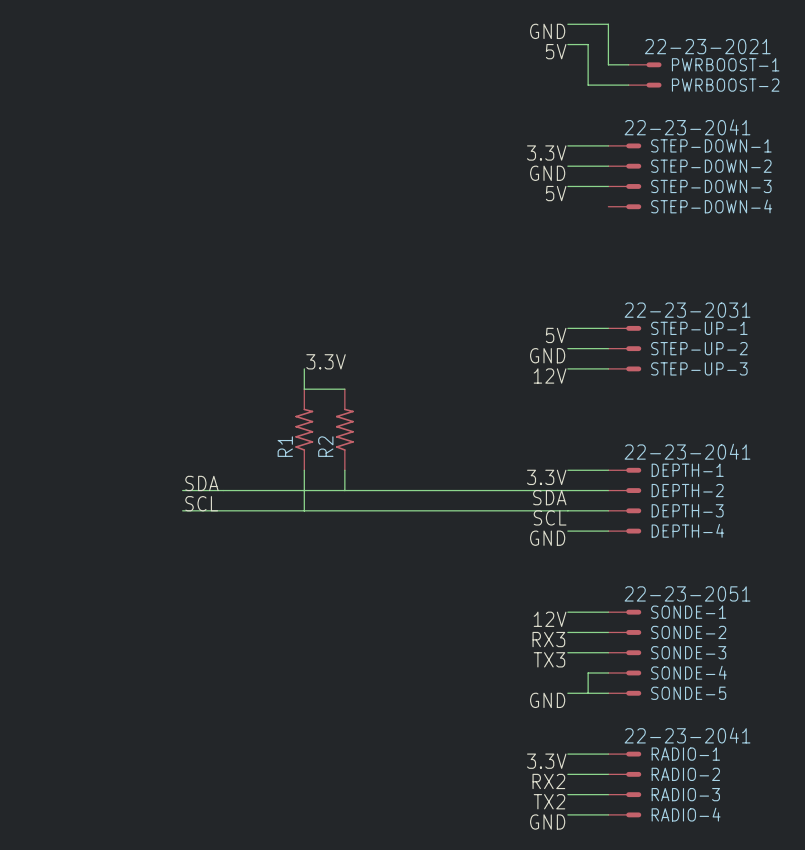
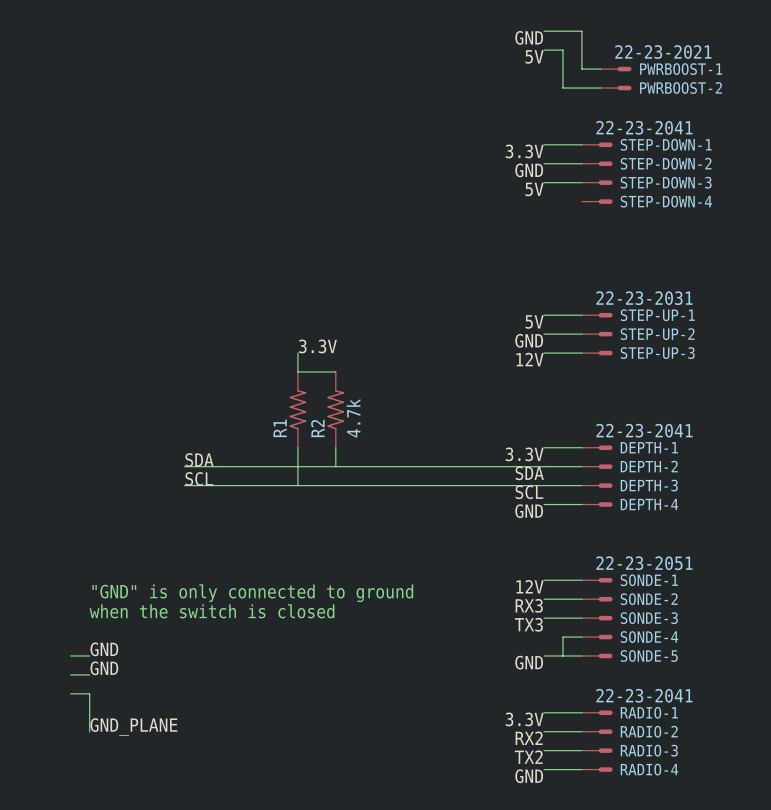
R2 value: none -> 4.7k (353, 418)
text: none -> "GND" is only connected to ground (252, 593)
text: none -> when the switch is closed (212, 611)
label: none -> GND (104, 649)
wire: none -> (70, 655) (89, 655)
label: none -> GND (104, 668)
wire: none -> (70, 674) (89, 674)
wire: none -> (70, 693) (89, 693) (89, 731)
label: none -> GND_PLANE (133, 727)

